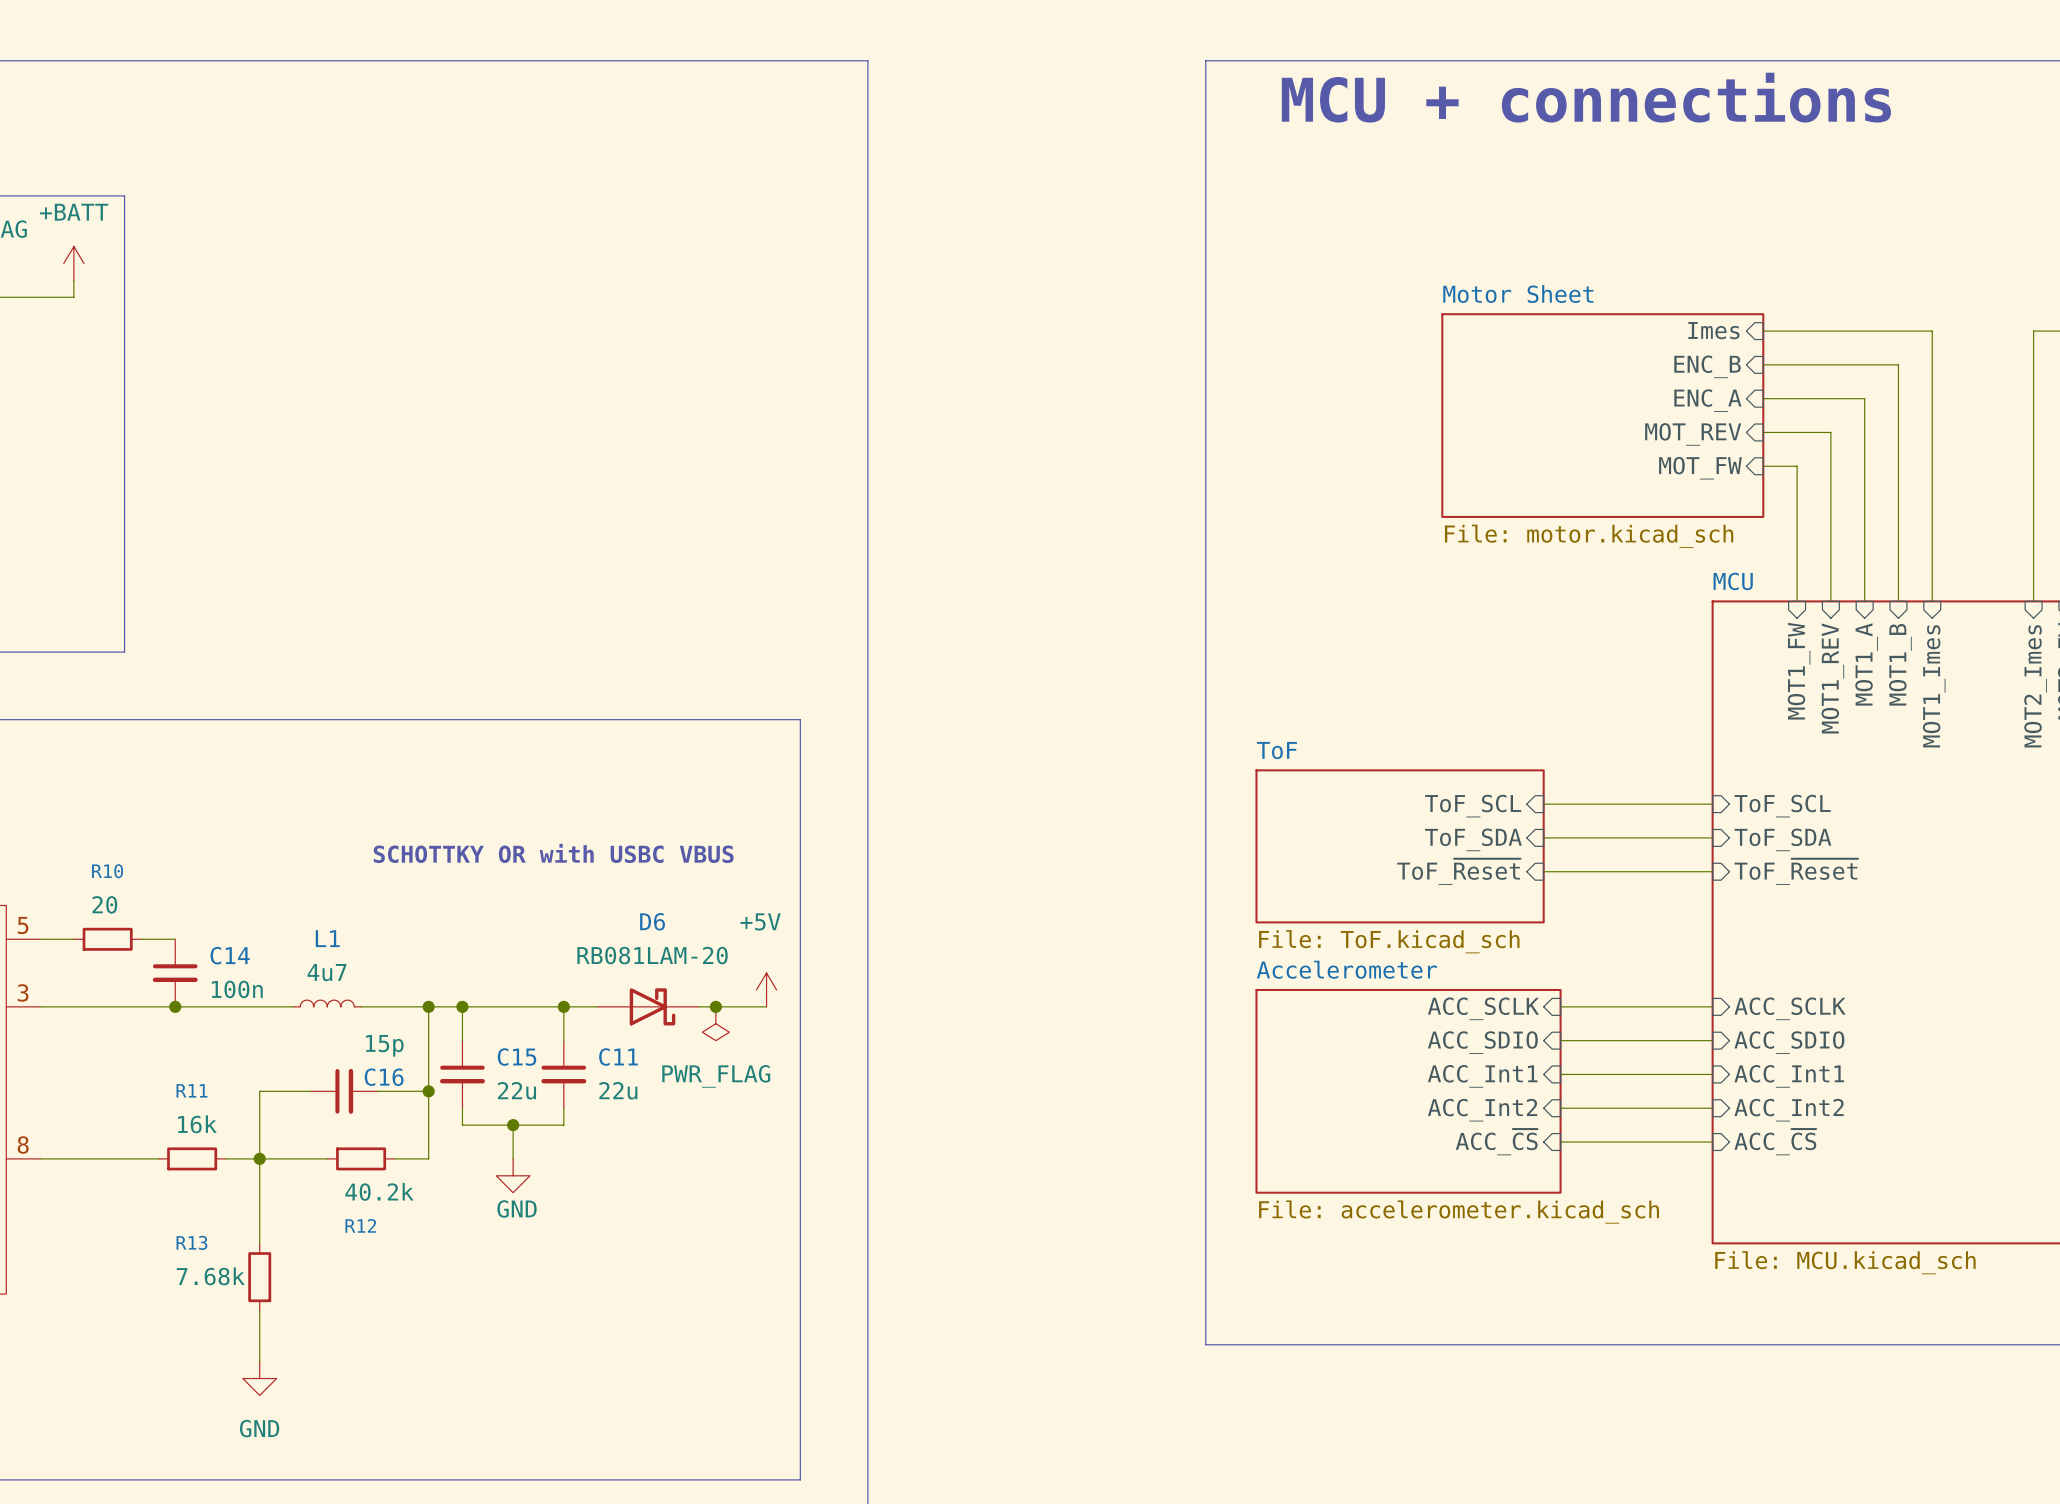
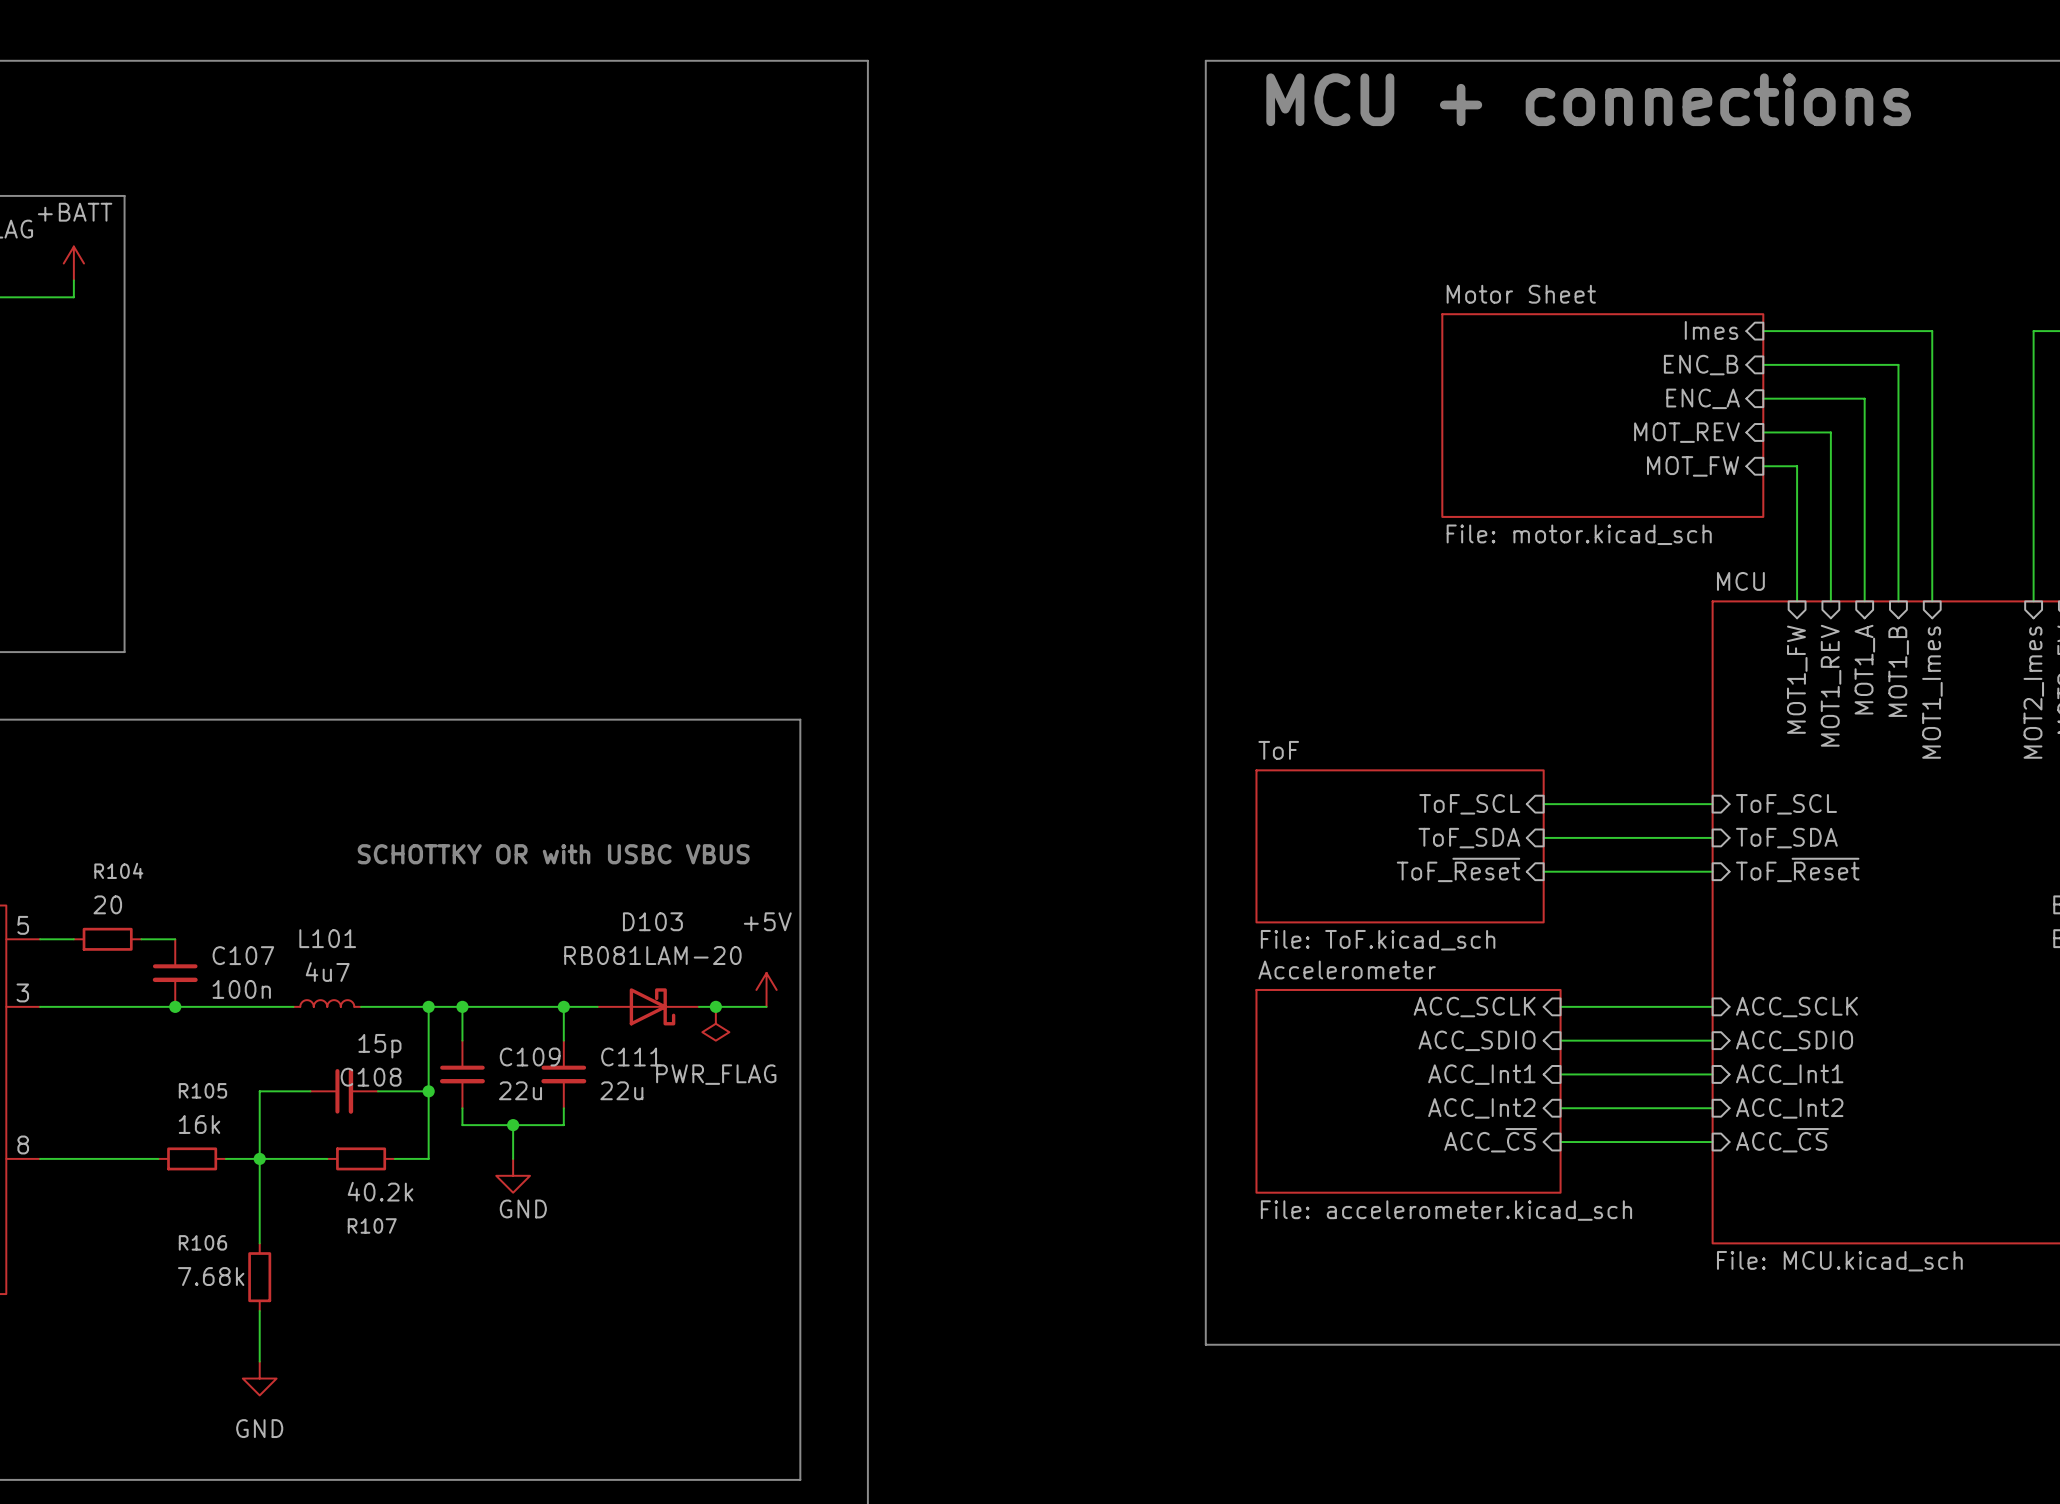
R10 name: R10 (107, 871) -> R104 (118, 870)
D6 name: D6 (652, 921) -> D103 (652, 921)
L1 name: L1 (327, 938) -> L101 (327, 938)
C14 name: C14 (230, 955) -> C107 (243, 955)
C15 name: C15 (517, 1057) -> C109 (530, 1057)
C11 name: C11 (618, 1057) -> C111 (631, 1057)
C16 name: C16 (384, 1077) -> C108 (371, 1077)
R11 name: R11 (192, 1090) -> R105 (202, 1090)
R12 name: R12 (360, 1225) -> R107 (372, 1225)
R13 name: R13 (191, 1242) -> R106 (202, 1242)

